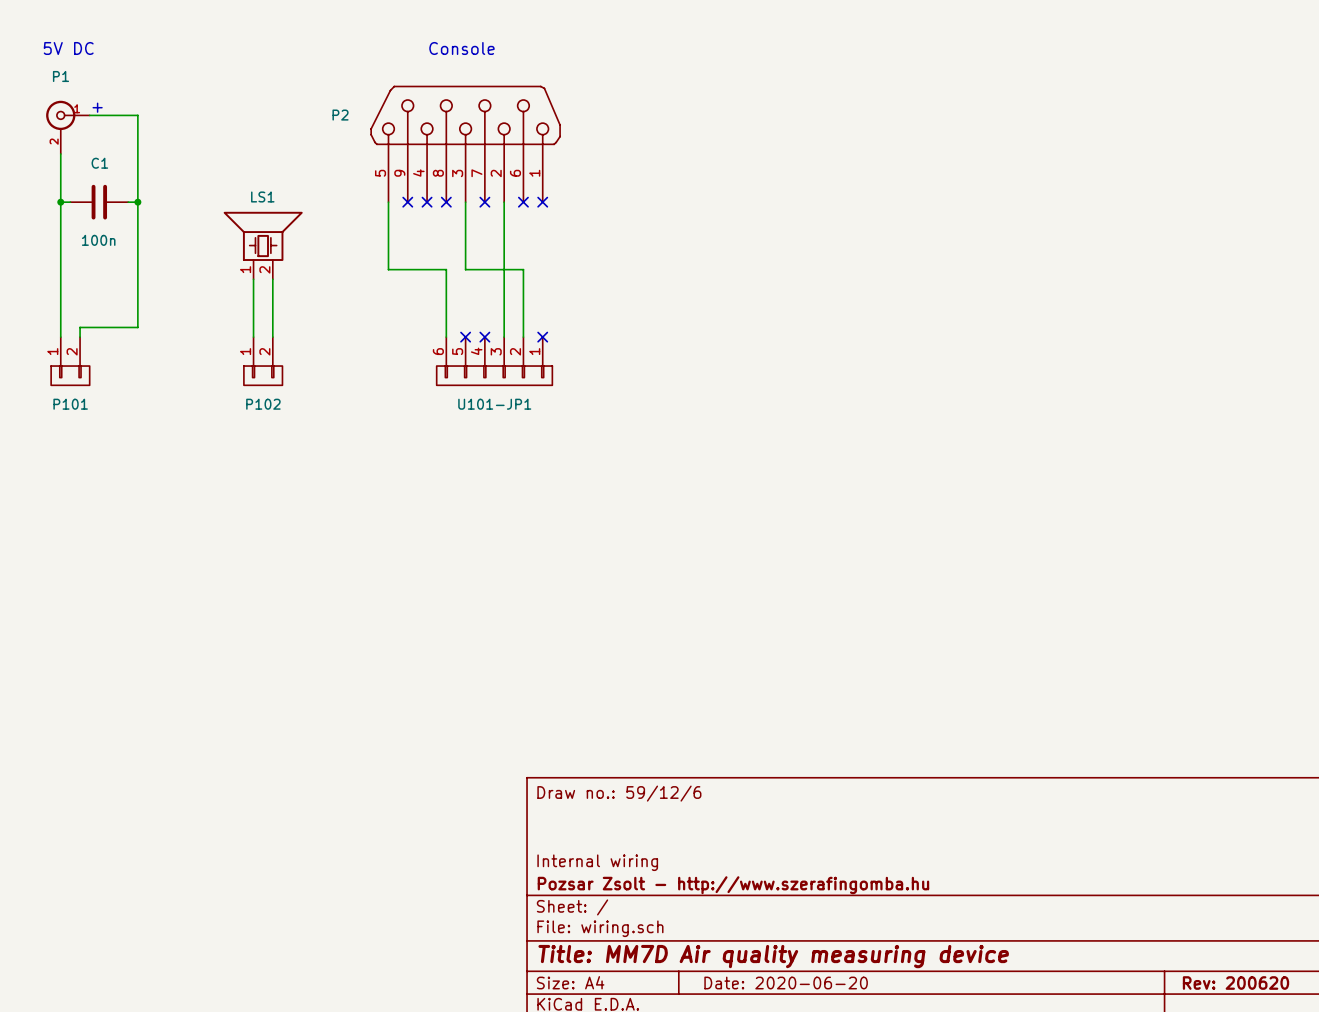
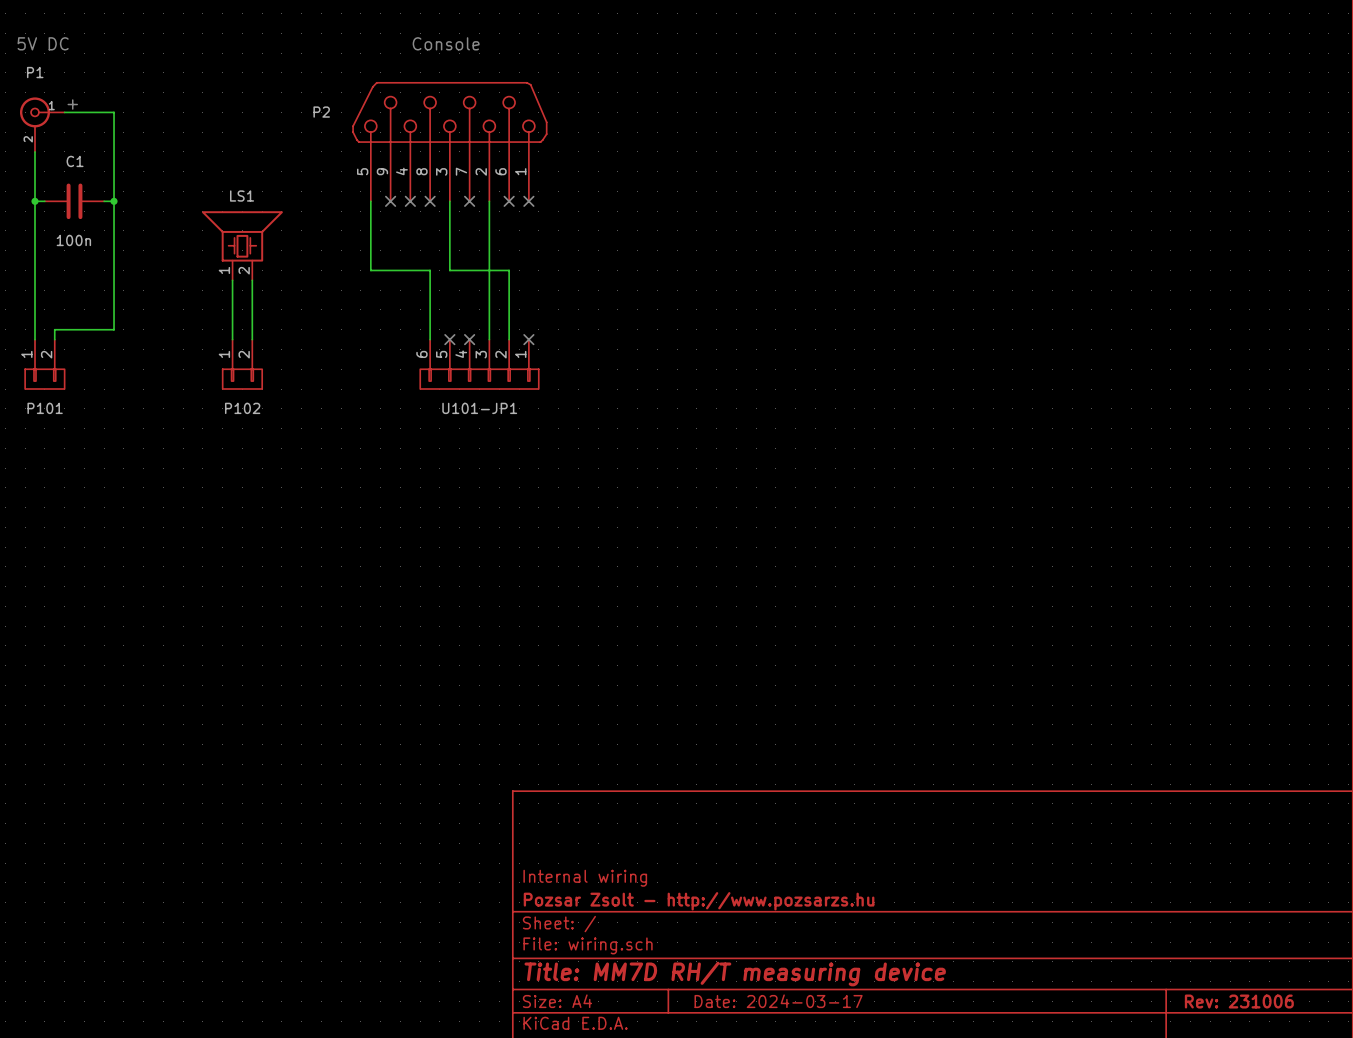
title block: Draw no.: 59/12/6 (619, 793) -> none
title block: Pozsar Zsolt - http://www.szerafingomba.hu (733, 885) -> Pozsar Zsolt - http://www.pozsarzs.hu (699, 901)
title block: Title: MM7D Air quality measuring device (773, 956) -> Title: MM7D RH/T measuring device (735, 974)
title block: Date: 2020-06-20 (786, 983) -> Date: 2024-03-17 (778, 1001)
title block: Rev: 200620 (1235, 983) -> Rev: 231006 (1239, 1001)

